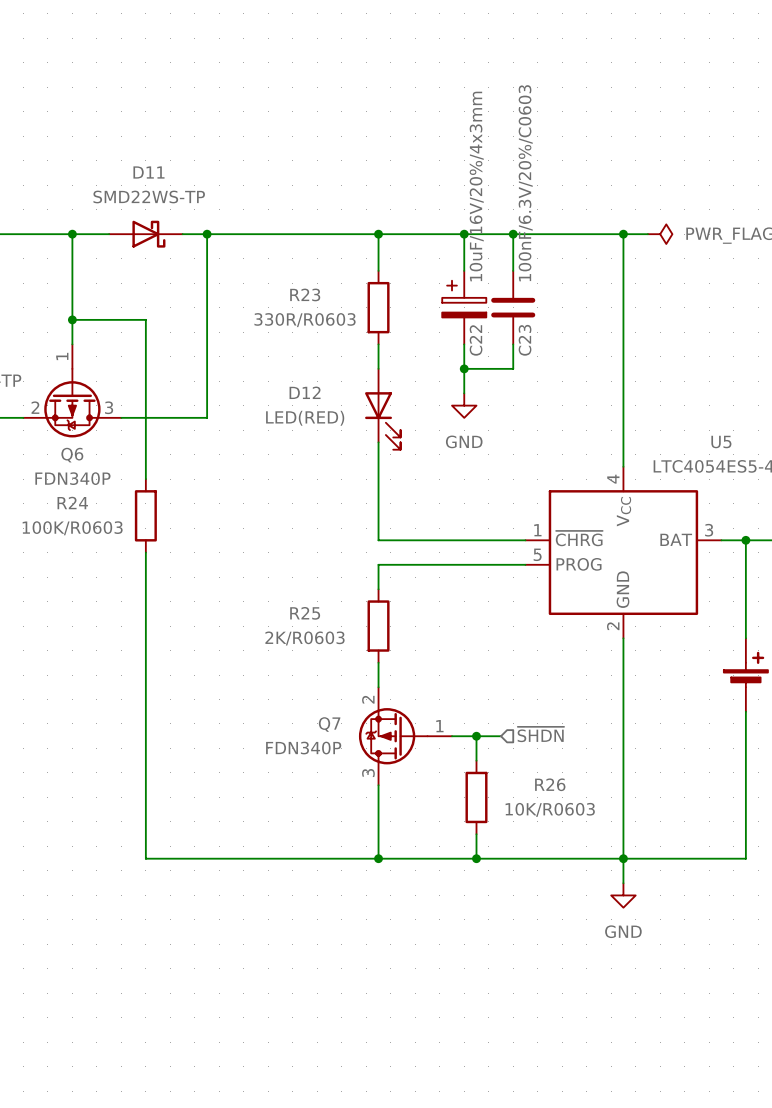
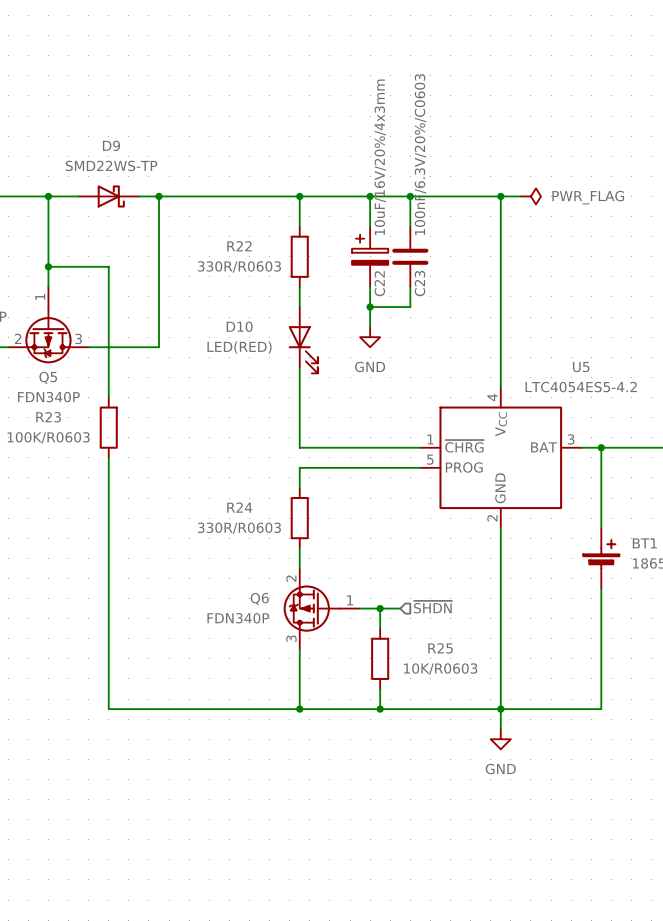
D11 name: D11 (148, 172) -> D9 (111, 145)
R23 name: R23 (305, 294) -> R22 (239, 246)
D12 name: D12 (305, 392) -> D10 (239, 326)
Q6 name: Q6 (72, 455) -> Q5 (48, 377)
R24 name: R24 (72, 503) -> R23 (48, 417)
R25 name: R25 (305, 613) -> R24 (239, 507)
R25 value: 2K/R0603 (305, 638) -> 330R/R0603 (239, 528)
Q7 name: Q7 (329, 724) -> Q6 (259, 598)
R26 name: R26 (550, 784) -> R25 (440, 648)

